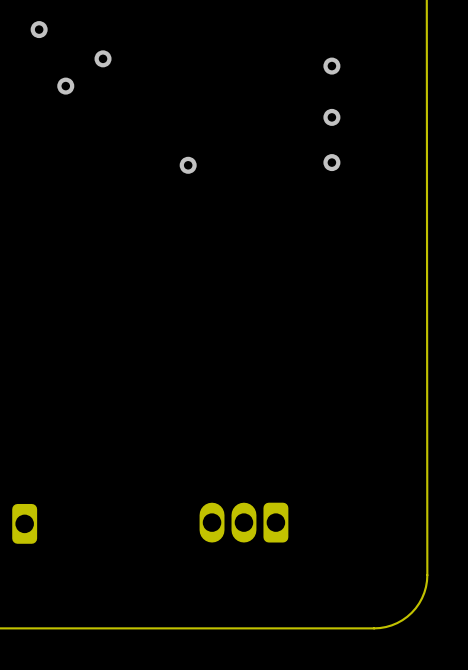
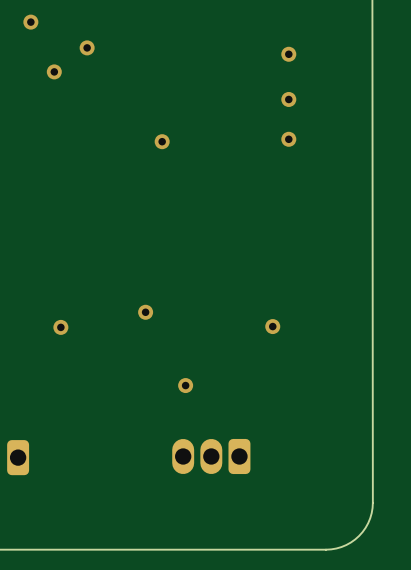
via: none -> (145, 312)
via: none -> (272, 326)
via: none -> (60, 327)
via: none -> (185, 385)

